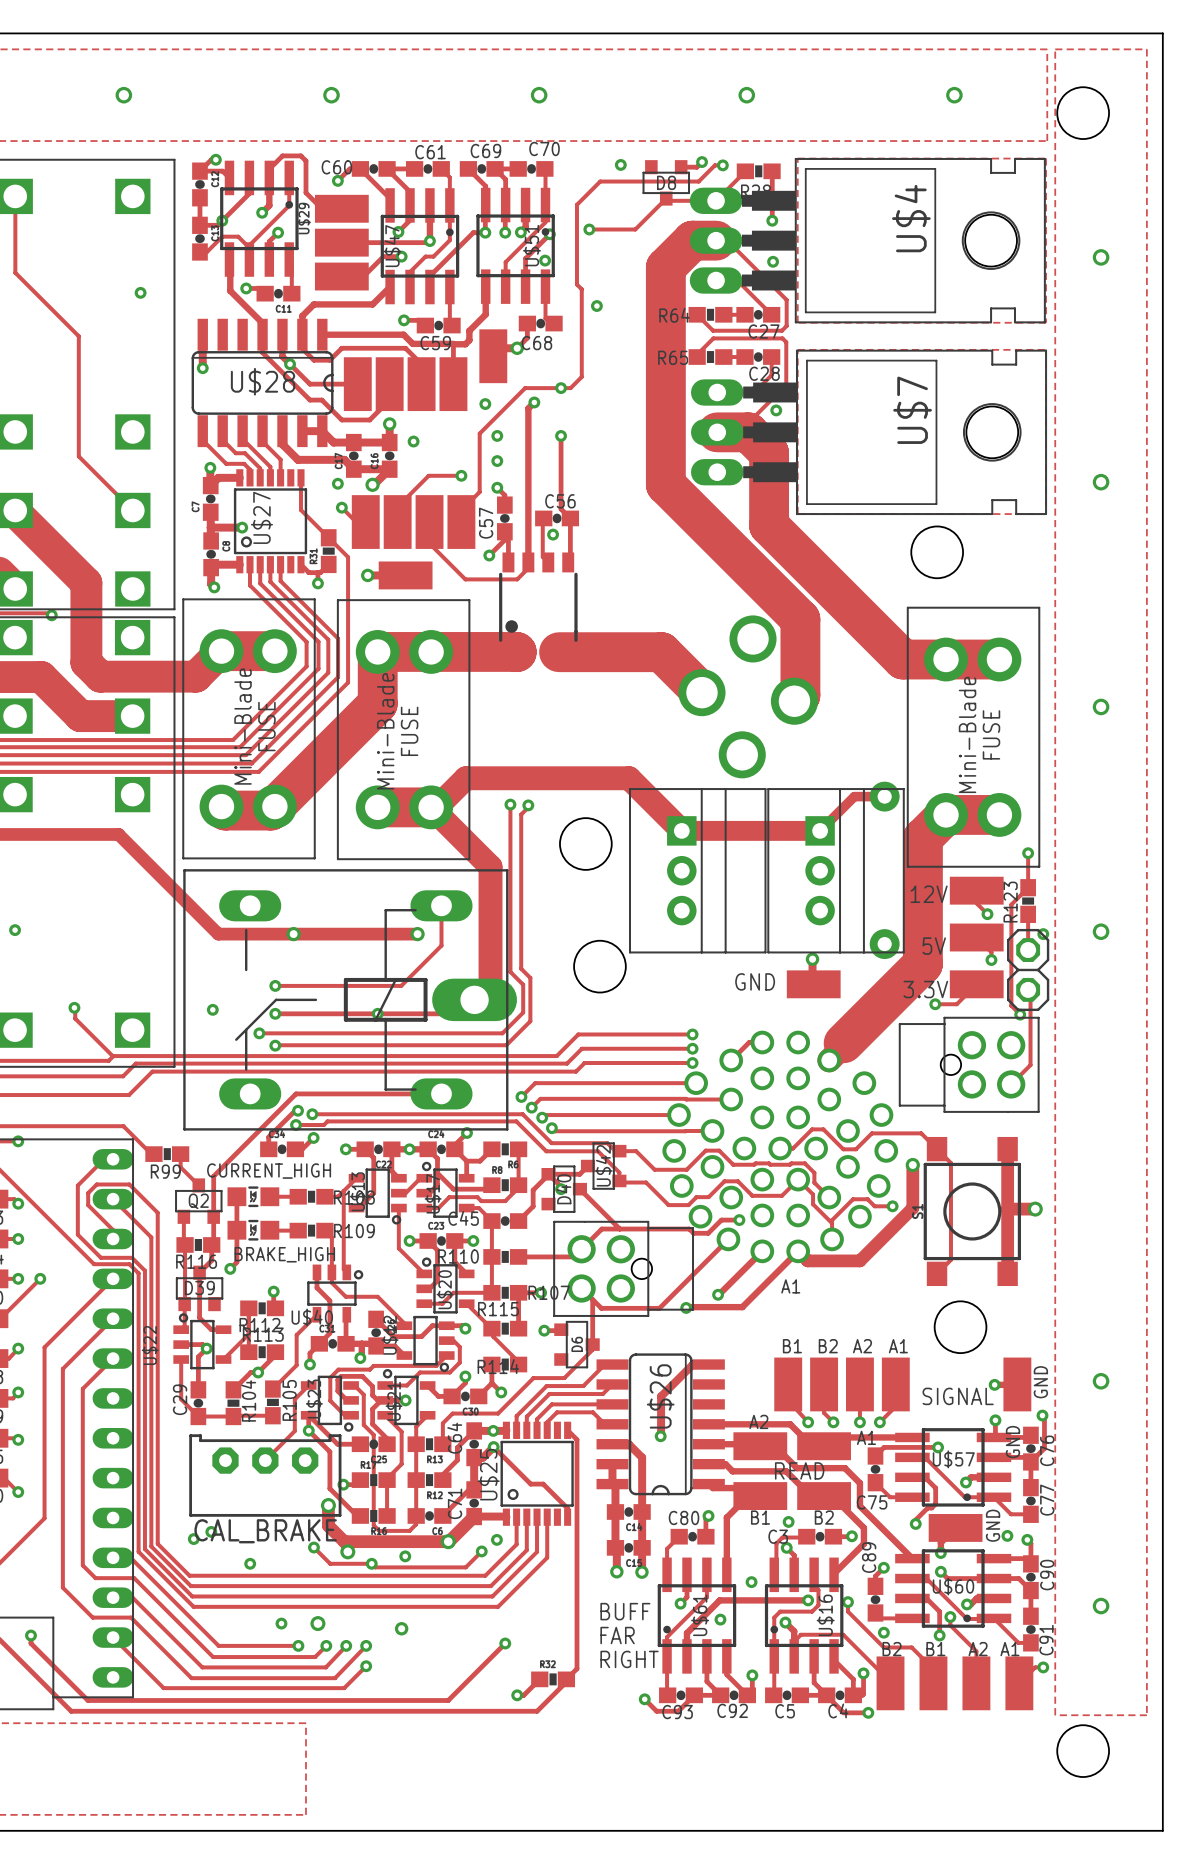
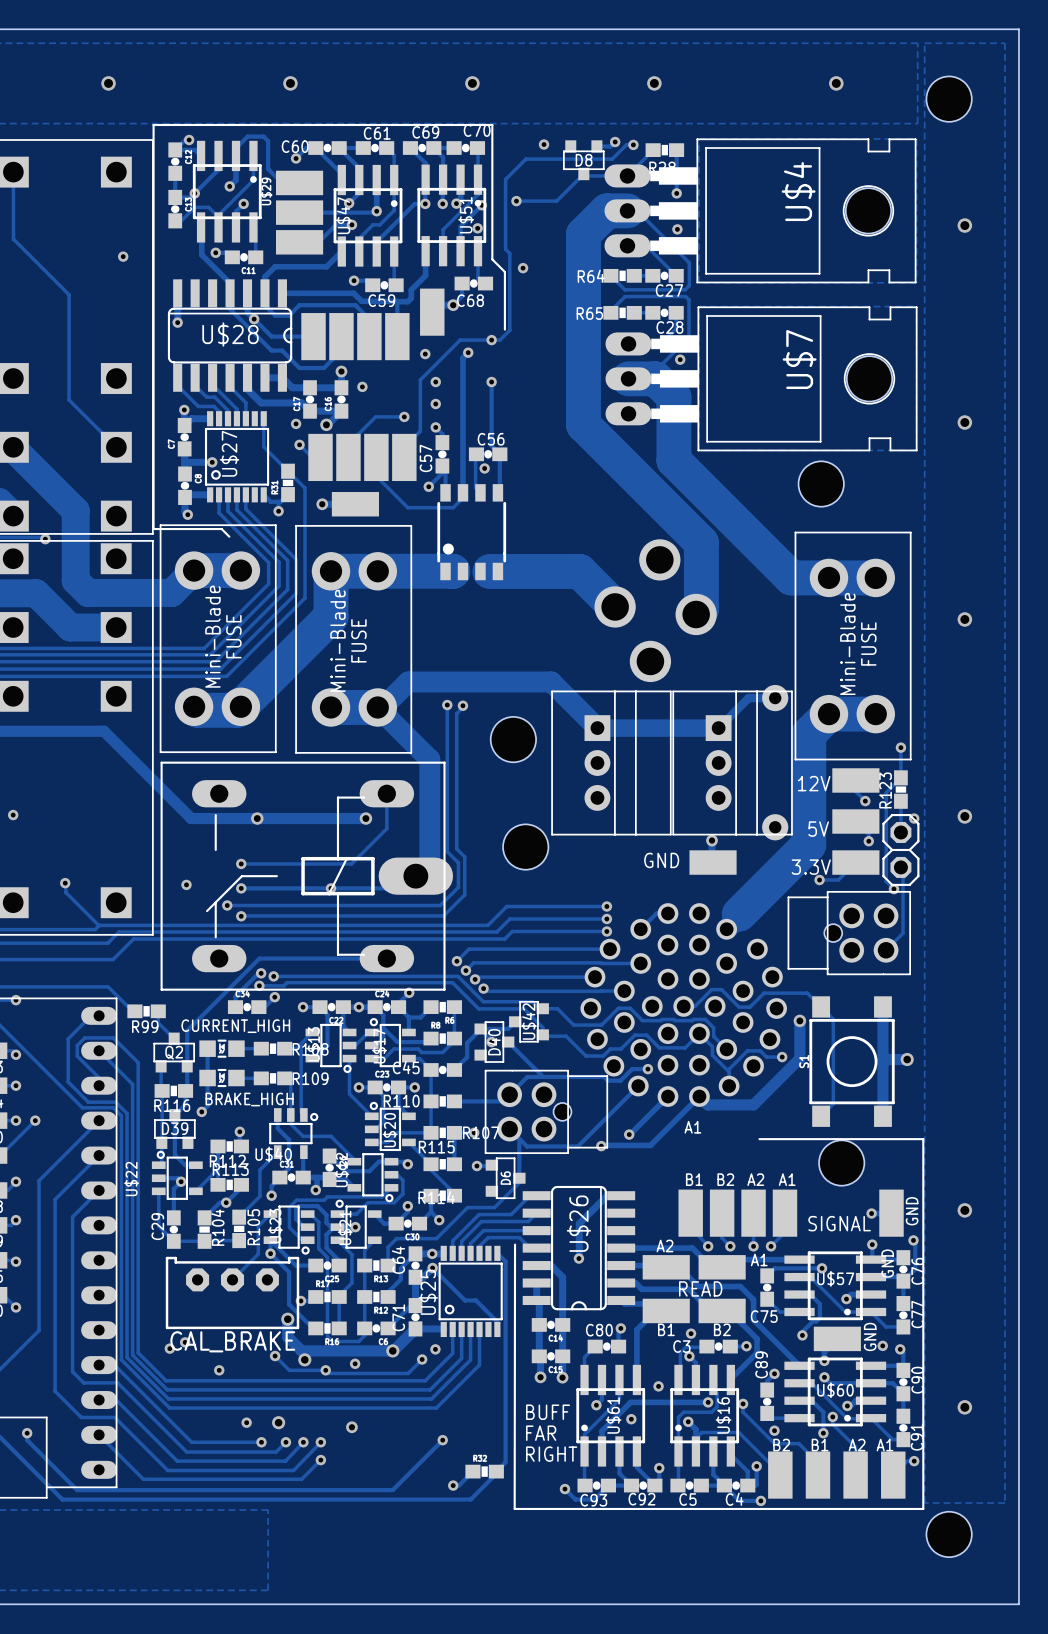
line: none -> (504, 329) (504, 272) (492, 259) (492, 124) (153, 124) (153, 529) (221, 529) (229, 536)
line: none -> (759, 1139) (923, 1139) (923, 1508) (514, 1508) (515, 1244)

